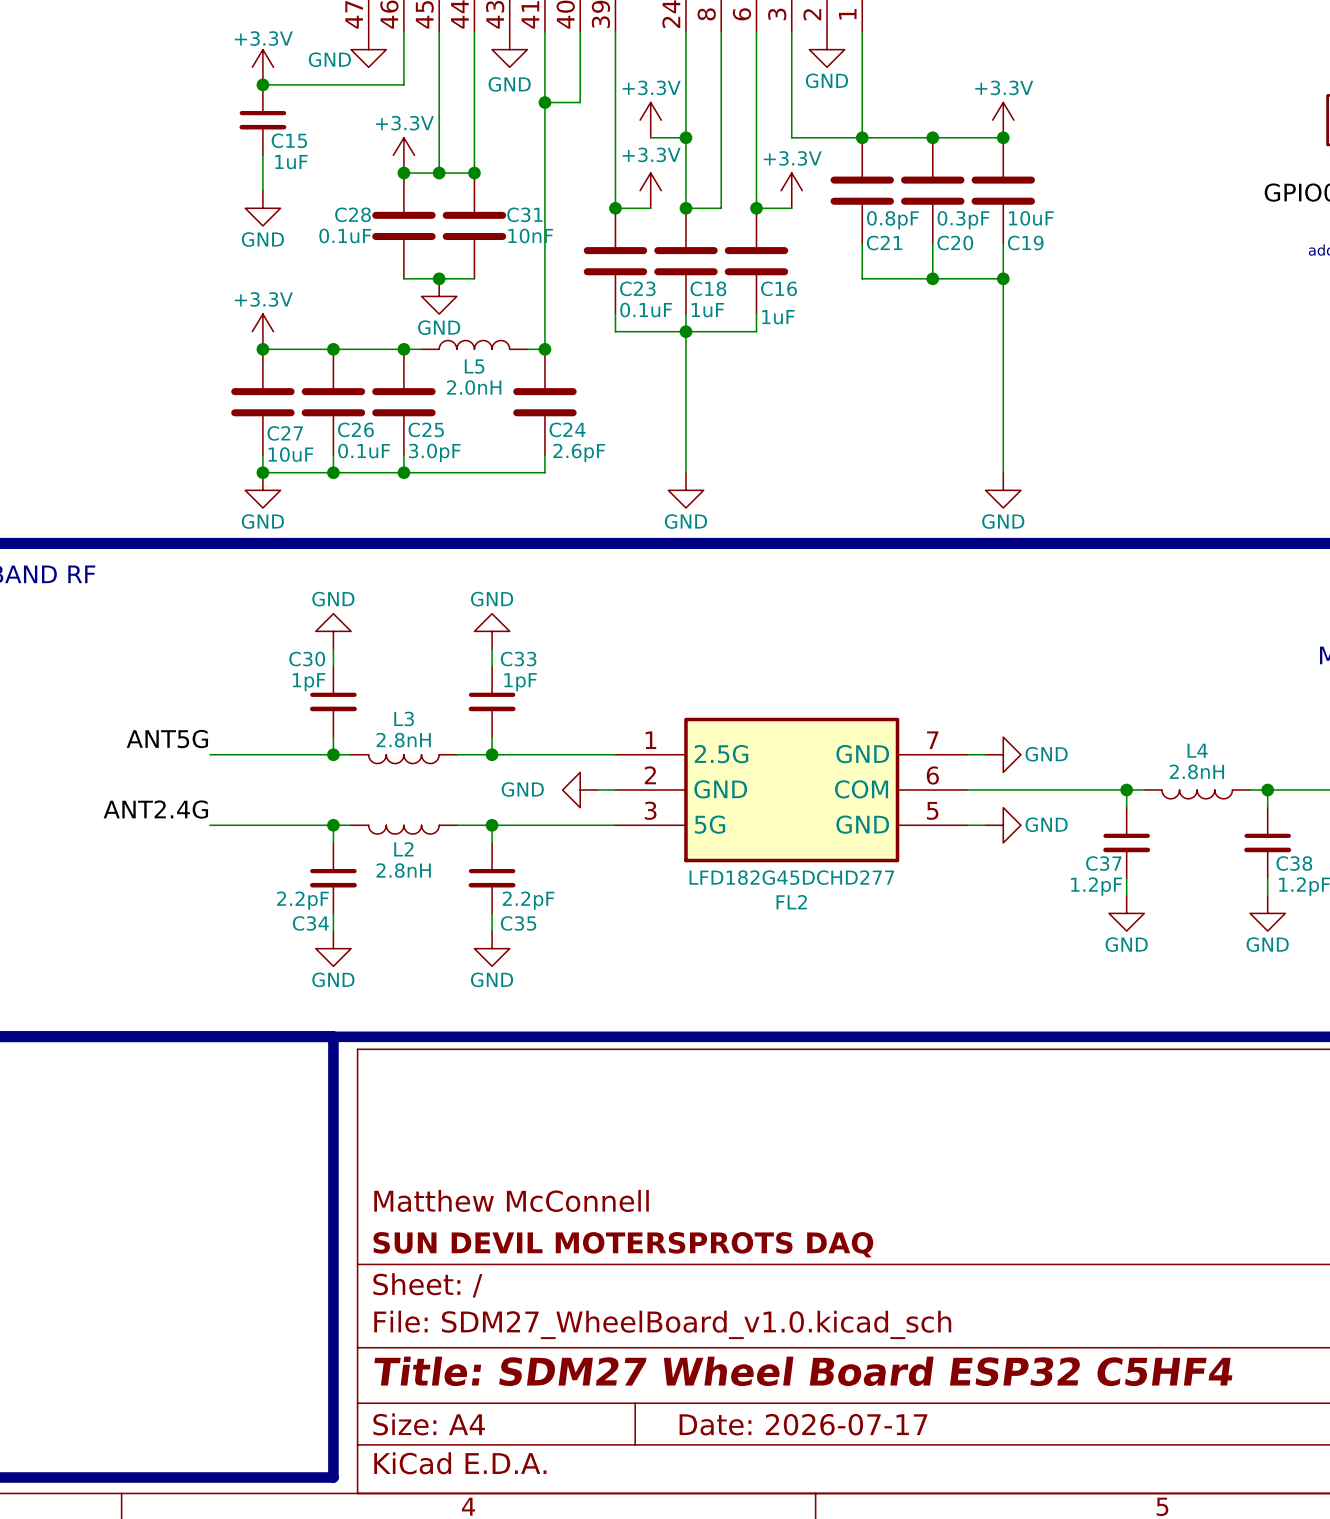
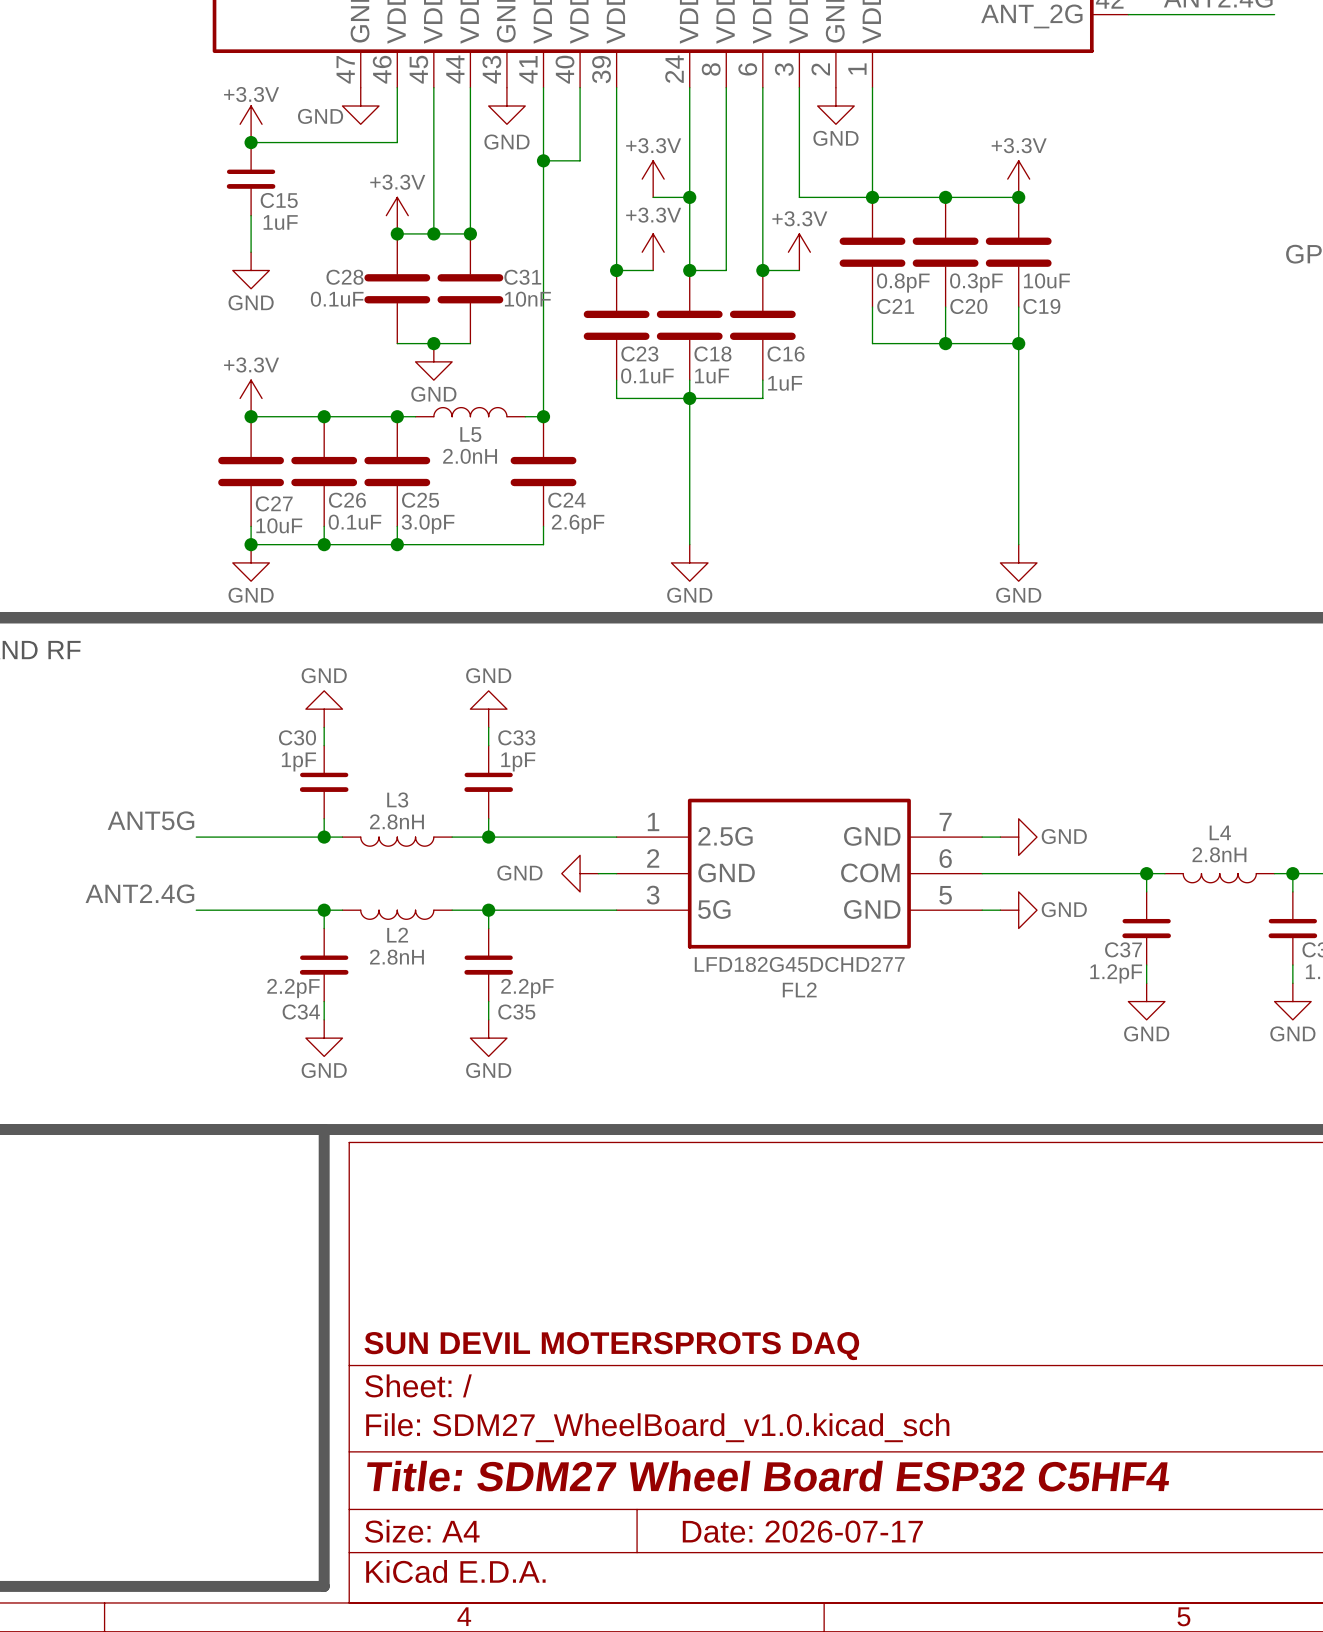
title block: Matthew McConnell (511, 1200) -> none

